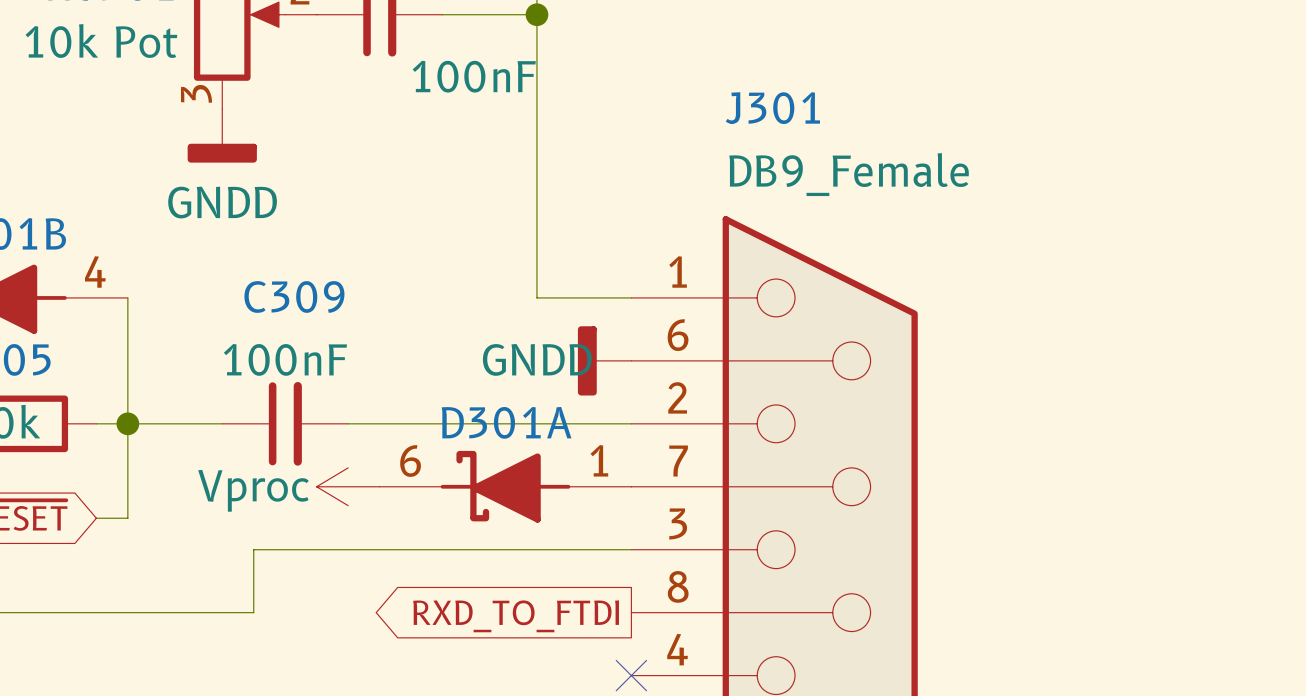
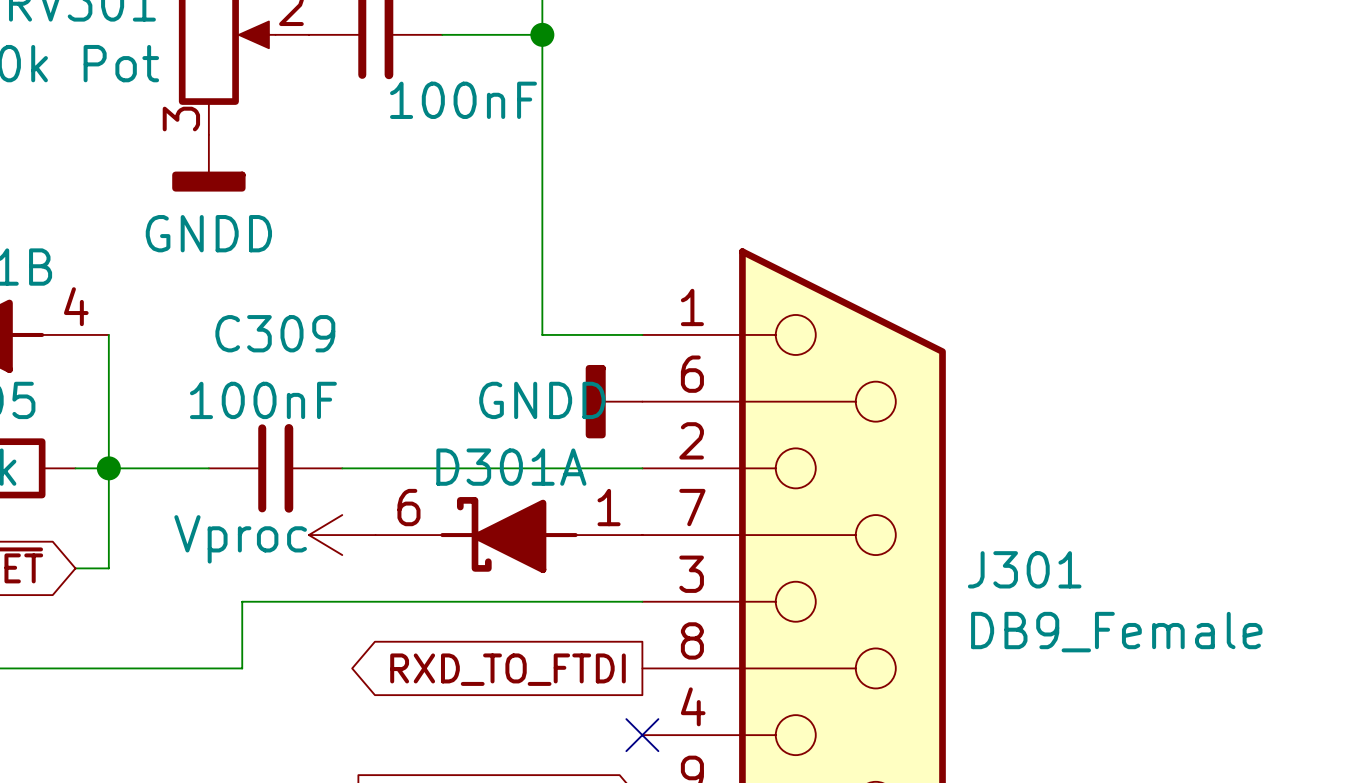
J301 name position: J301 (772, 108) -> J301 (1024, 569)
J301 value position: DB9_Female (849, 174) -> DB9_Female (1116, 632)

